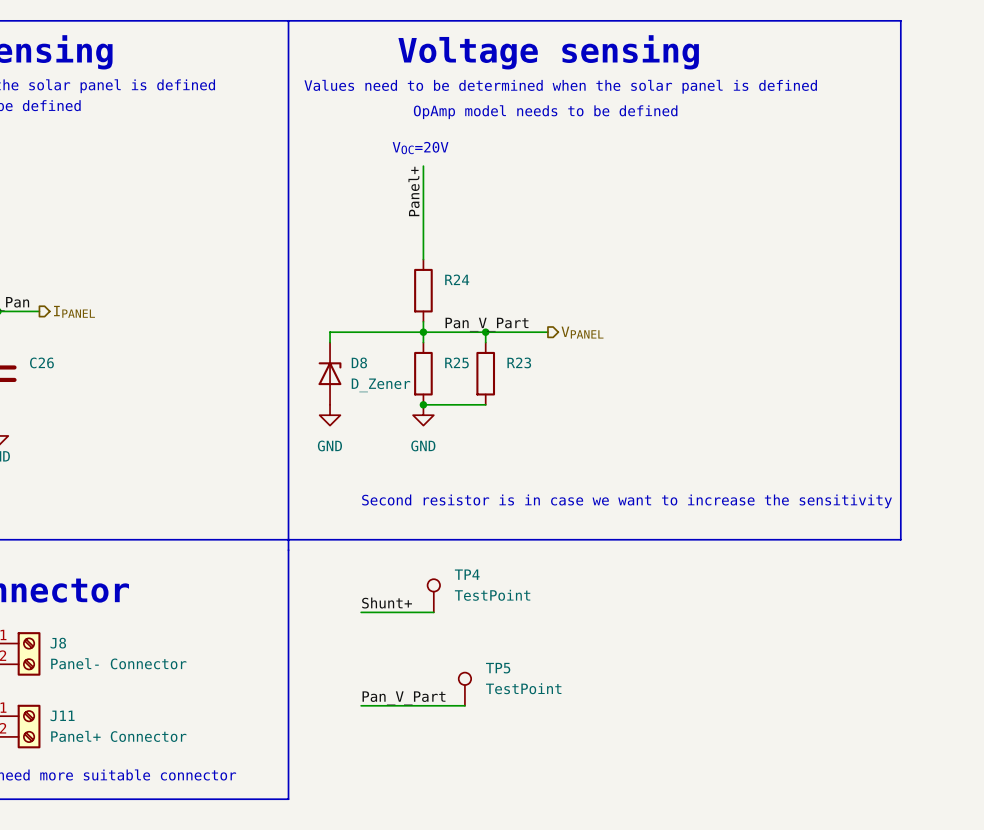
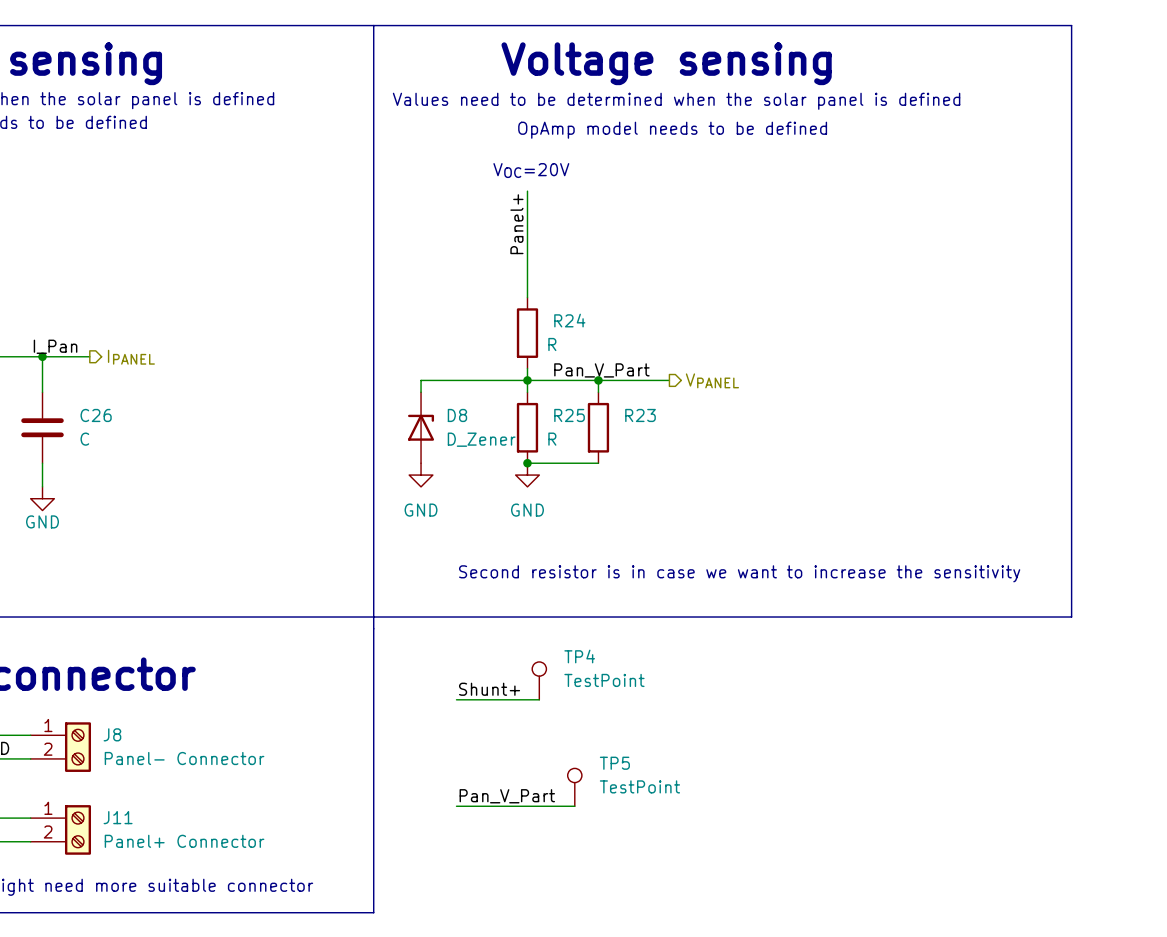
R24 value: none -> R (552, 344)
C26 value: none -> C (84, 439)
R25 value: none -> R (552, 439)

